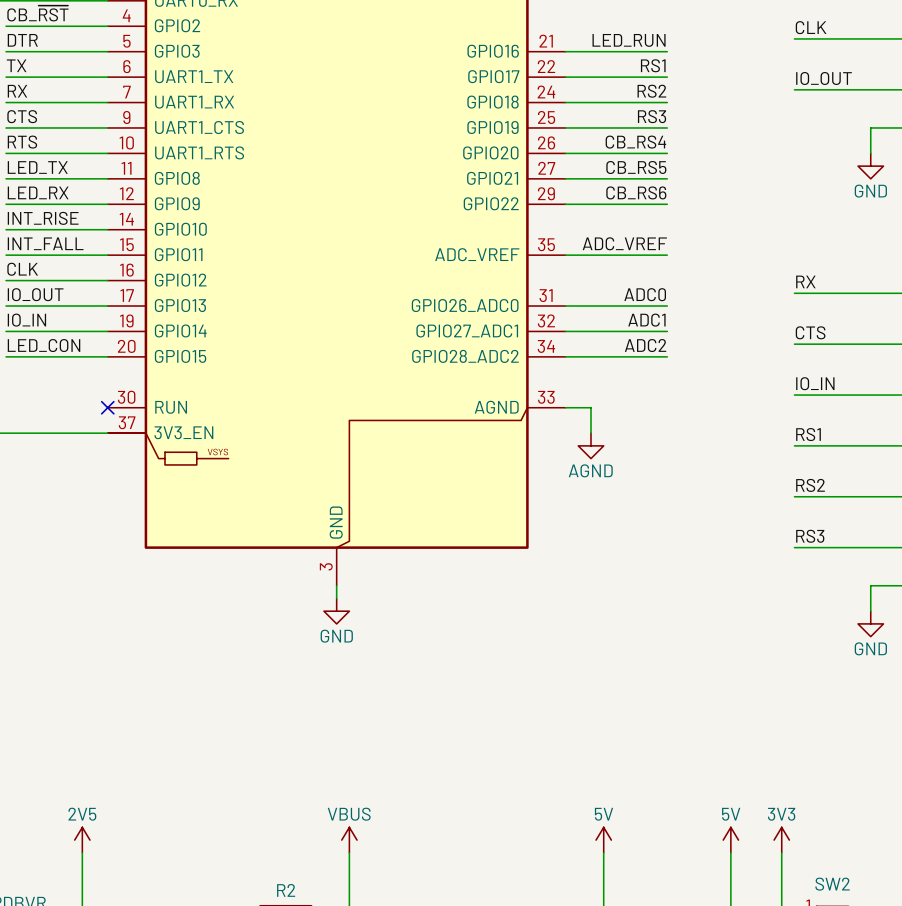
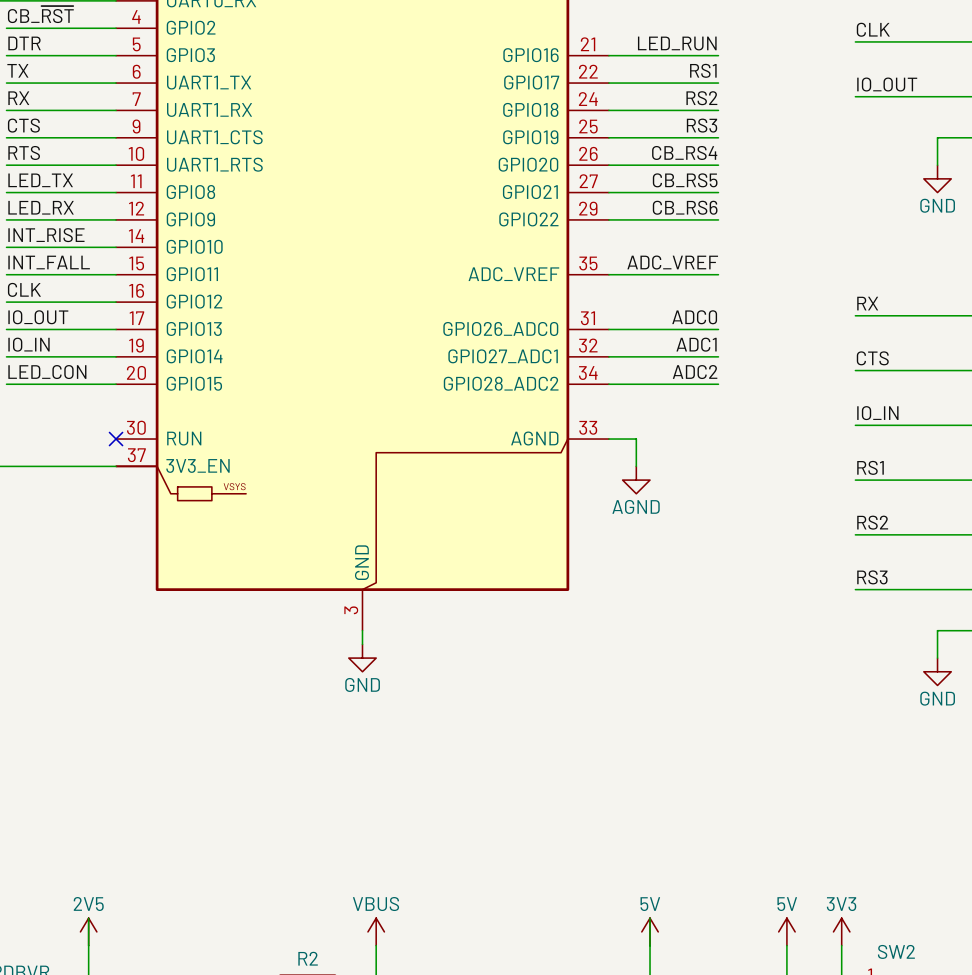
power symbol position: 2V5 (82, 840) -> 2V5 (88, 931)
power symbol position: VBUS (349, 840) -> VBUS (376, 931)
power symbol position: 5V (603, 840) -> 5V (650, 931)
power symbol position: 5V (730, 840) -> 5V (786, 931)
power symbol position: 3V3 (781, 840) -> 3V3 (841, 931)

